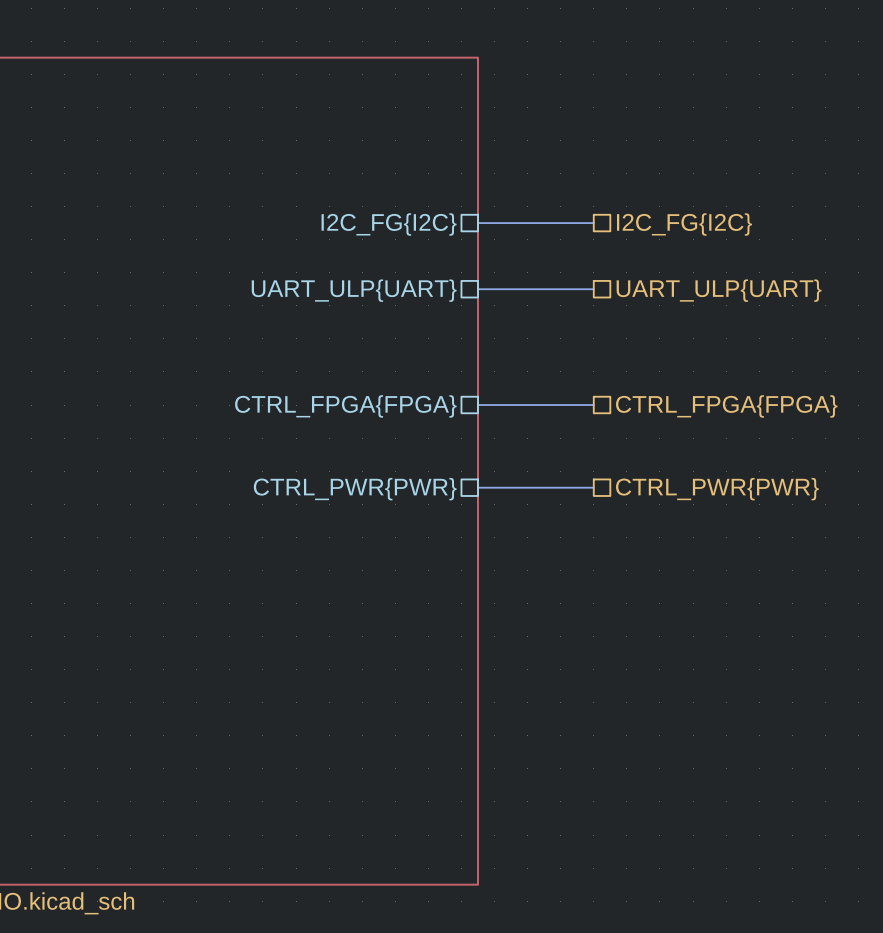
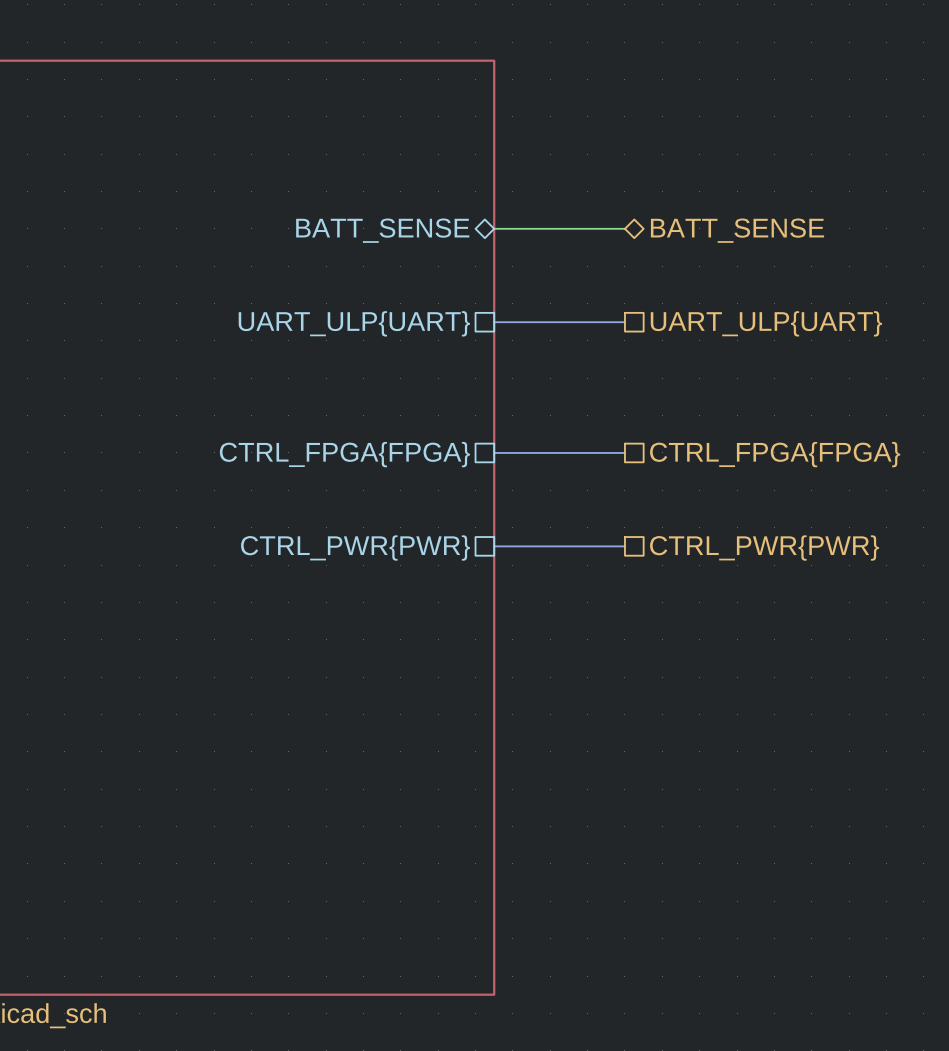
wire: none -> (494, 228) (624, 228)
sheet pin: none -> BATT_SENSE (382, 230)
hierarchical label: none -> BATT_SENSE (737, 230)
bus: (477, 223) (593, 223) -> none
sheet pin: I2C_FG{I2C} (389, 224) -> none
hierarchical label: I2C_FG{I2C} (684, 224) -> none

